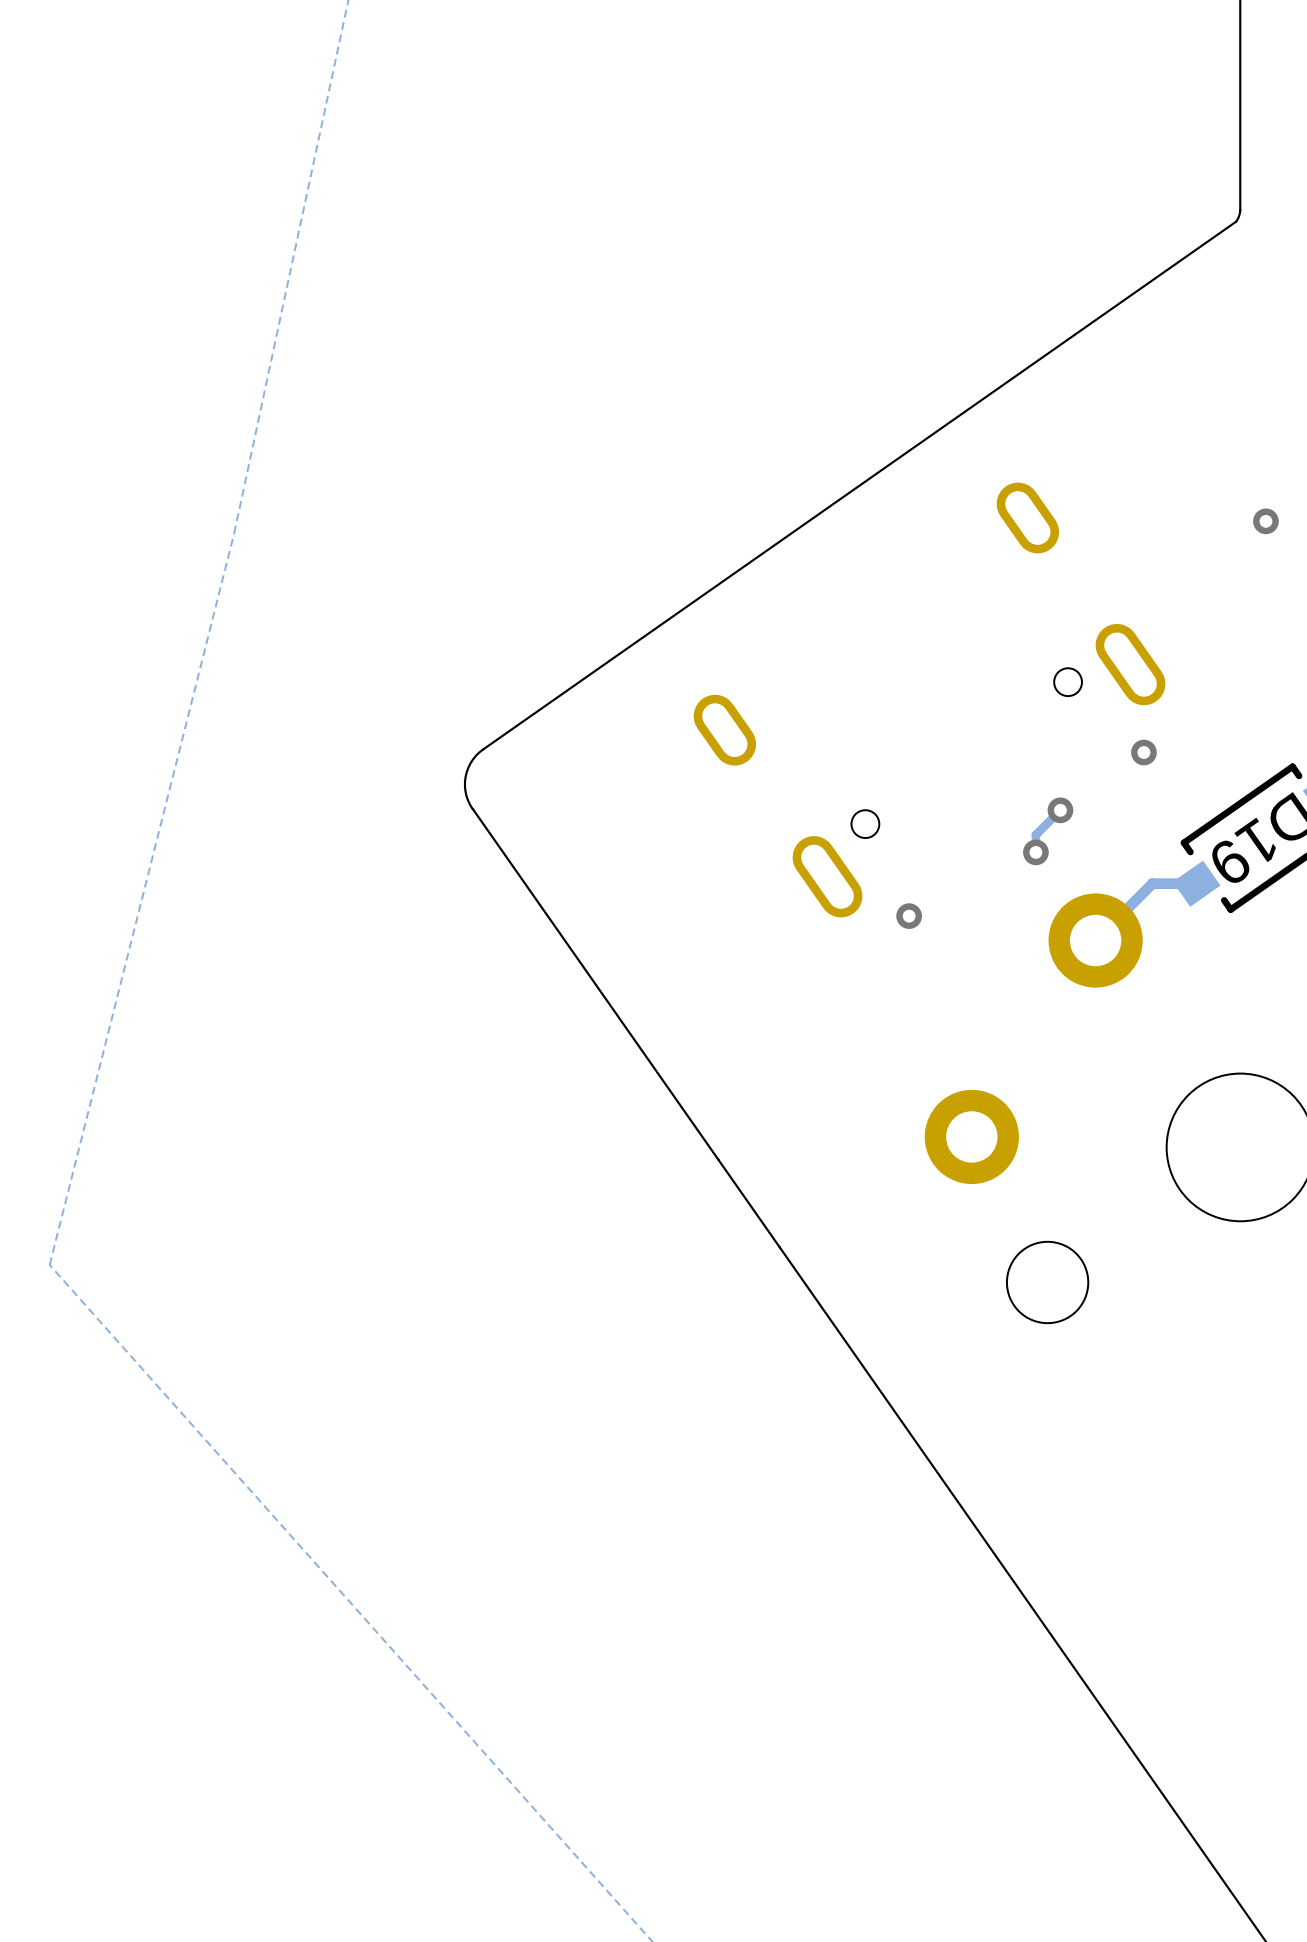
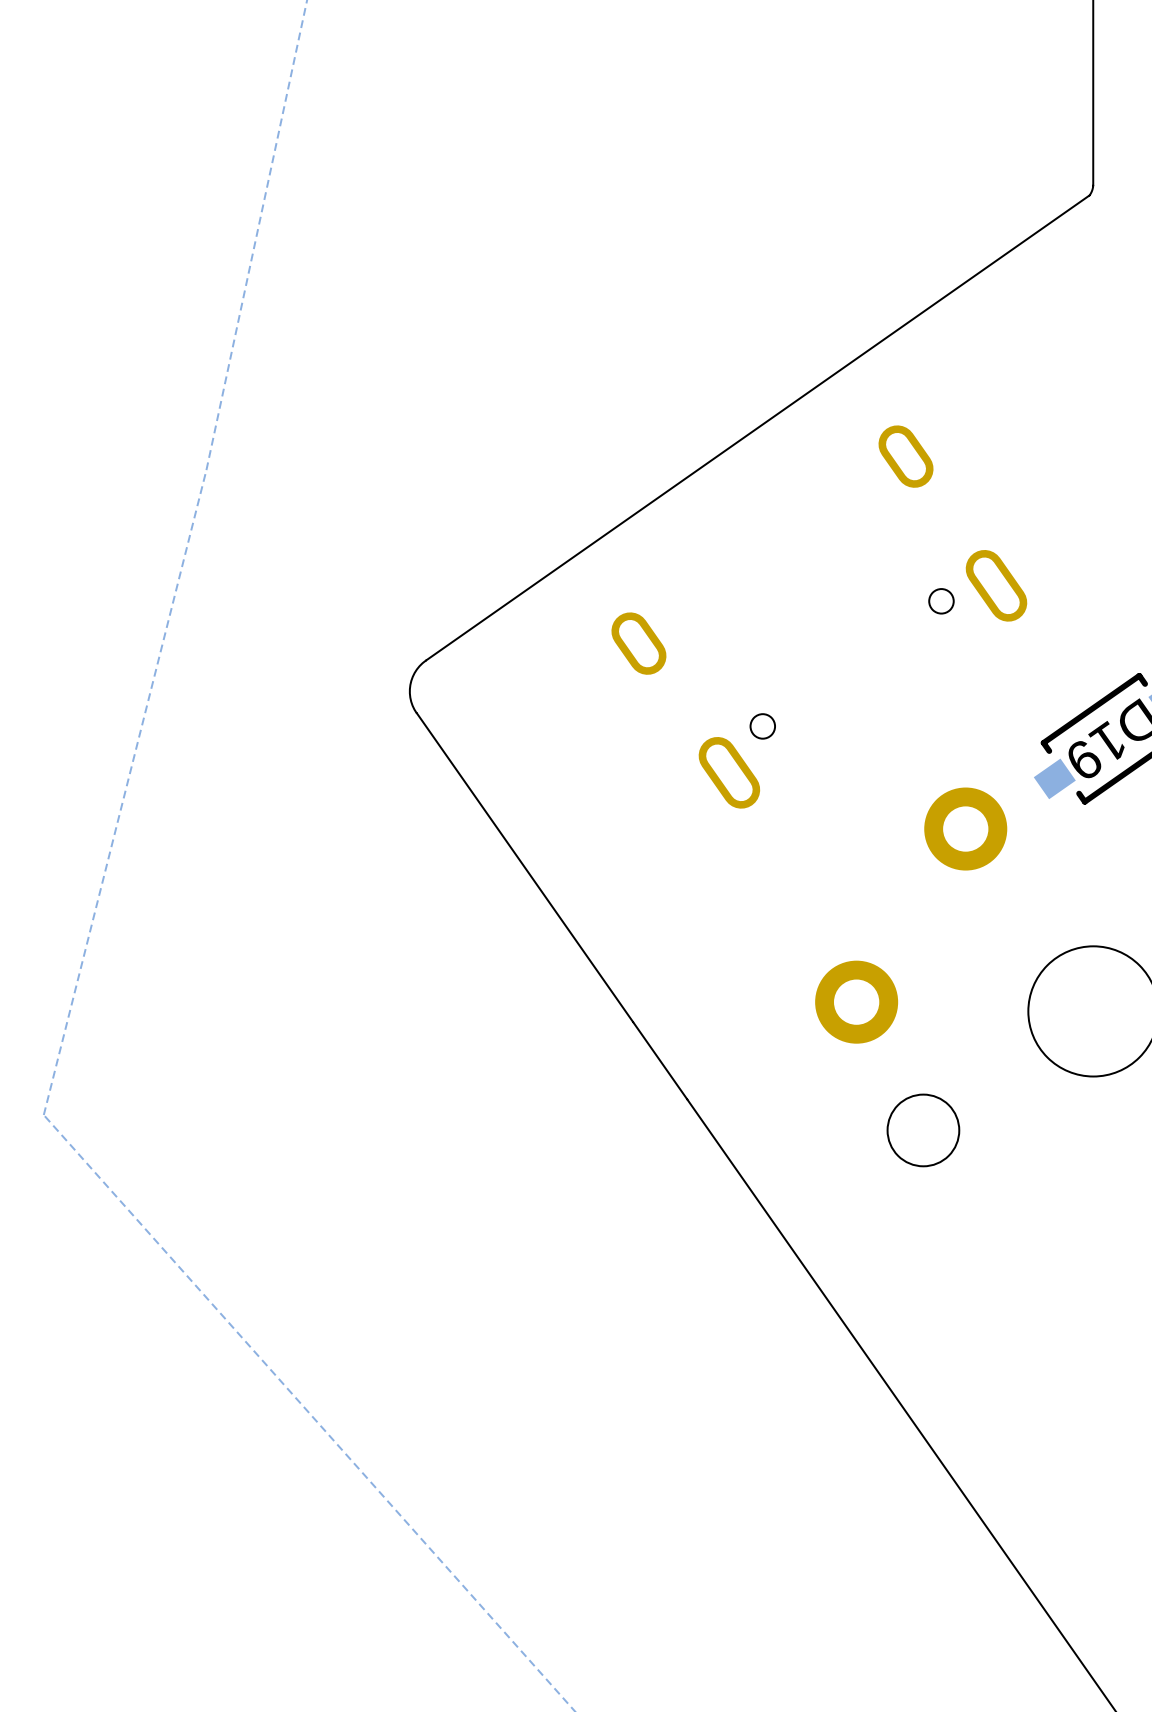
via: (1265, 521) -> none
via: (1143, 752) -> none
track: (1060, 810) (1035, 834) (1035, 852) -> none
via: (1060, 810) -> none
via: (1035, 852) -> none
track: (1196, 883) (1152, 883) (1095, 940) -> none
via: (909, 916) -> none

